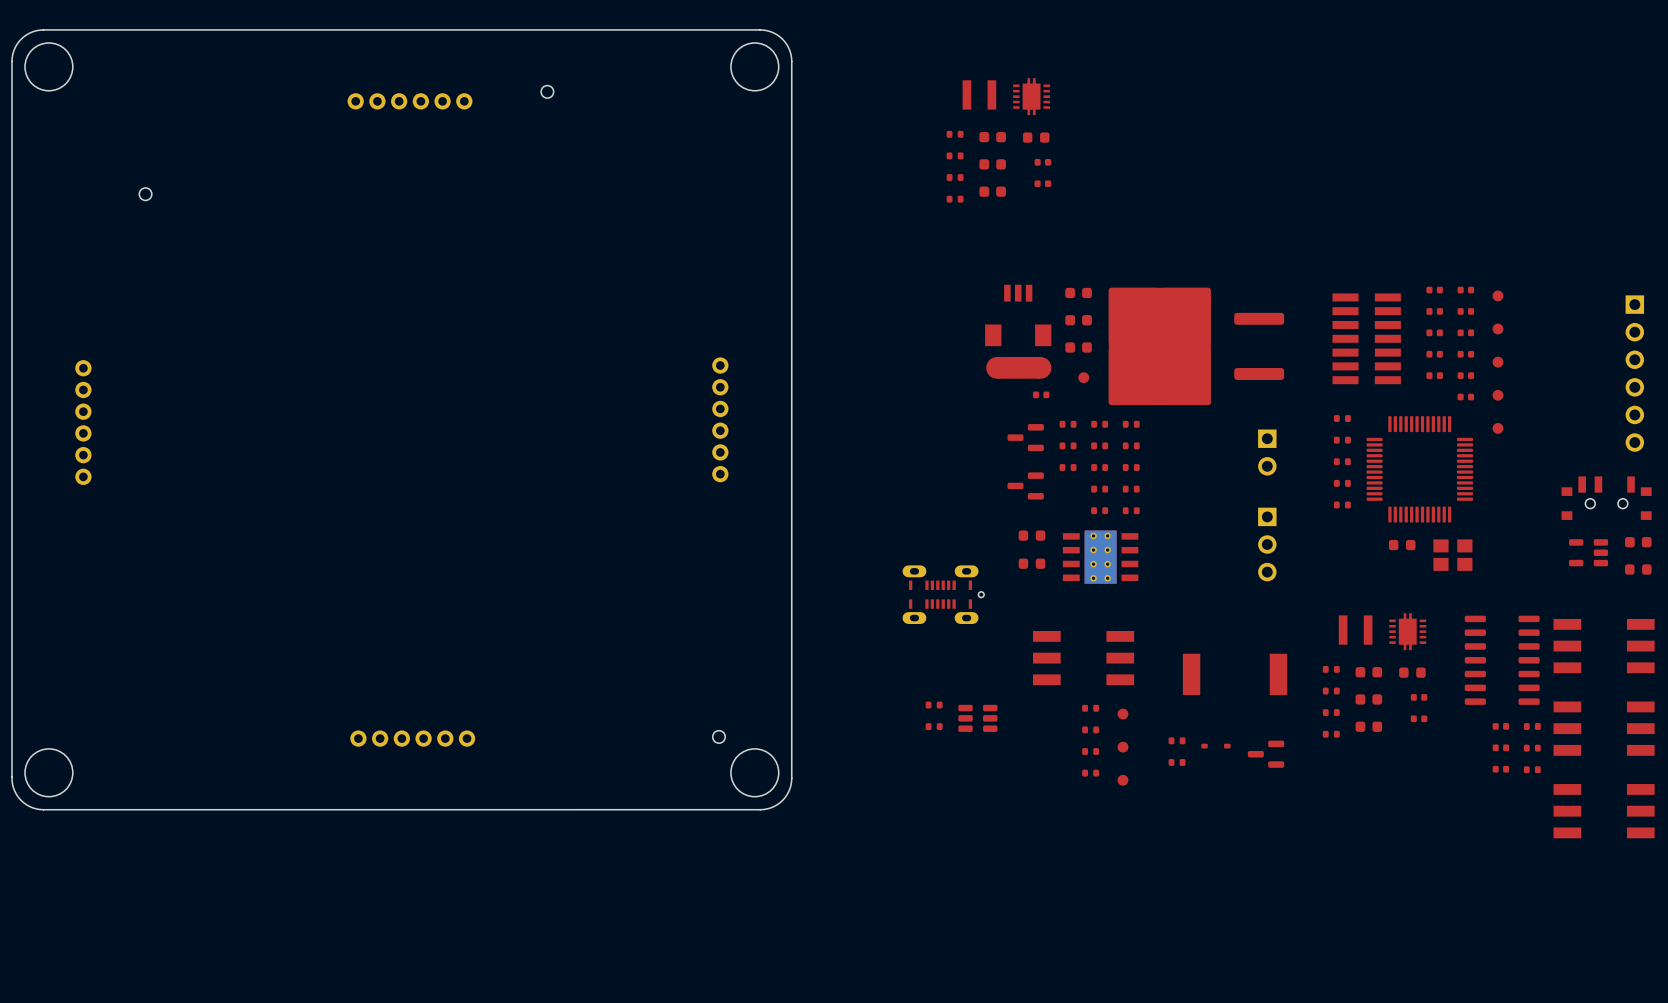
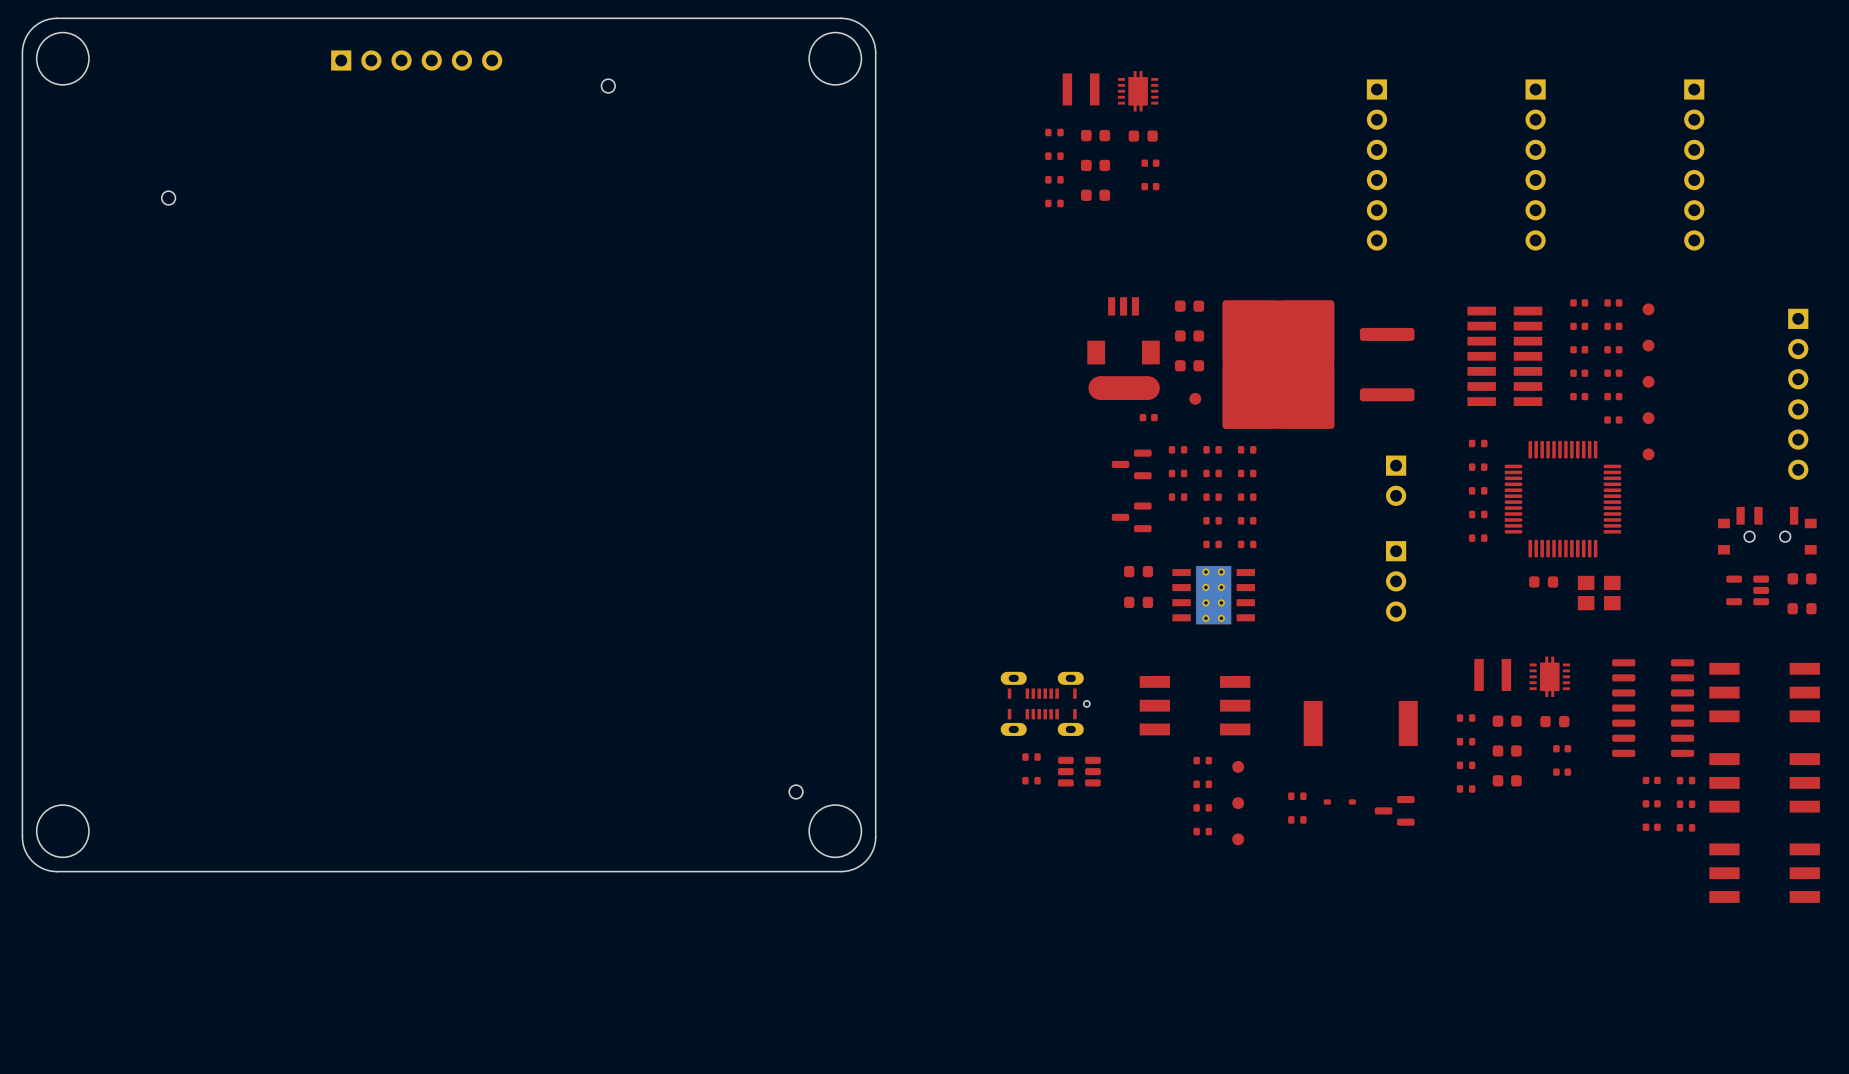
part: none -> (416, 60)
part: (410, 101) -> none
part: none -> (1376, 164)
part: none -> (1535, 164)
part: none -> (1694, 164)
part: (720, 419) -> none
part: (83, 422) -> none
part position: (939, 594) -> (1041, 703)
part: (412, 738) -> none

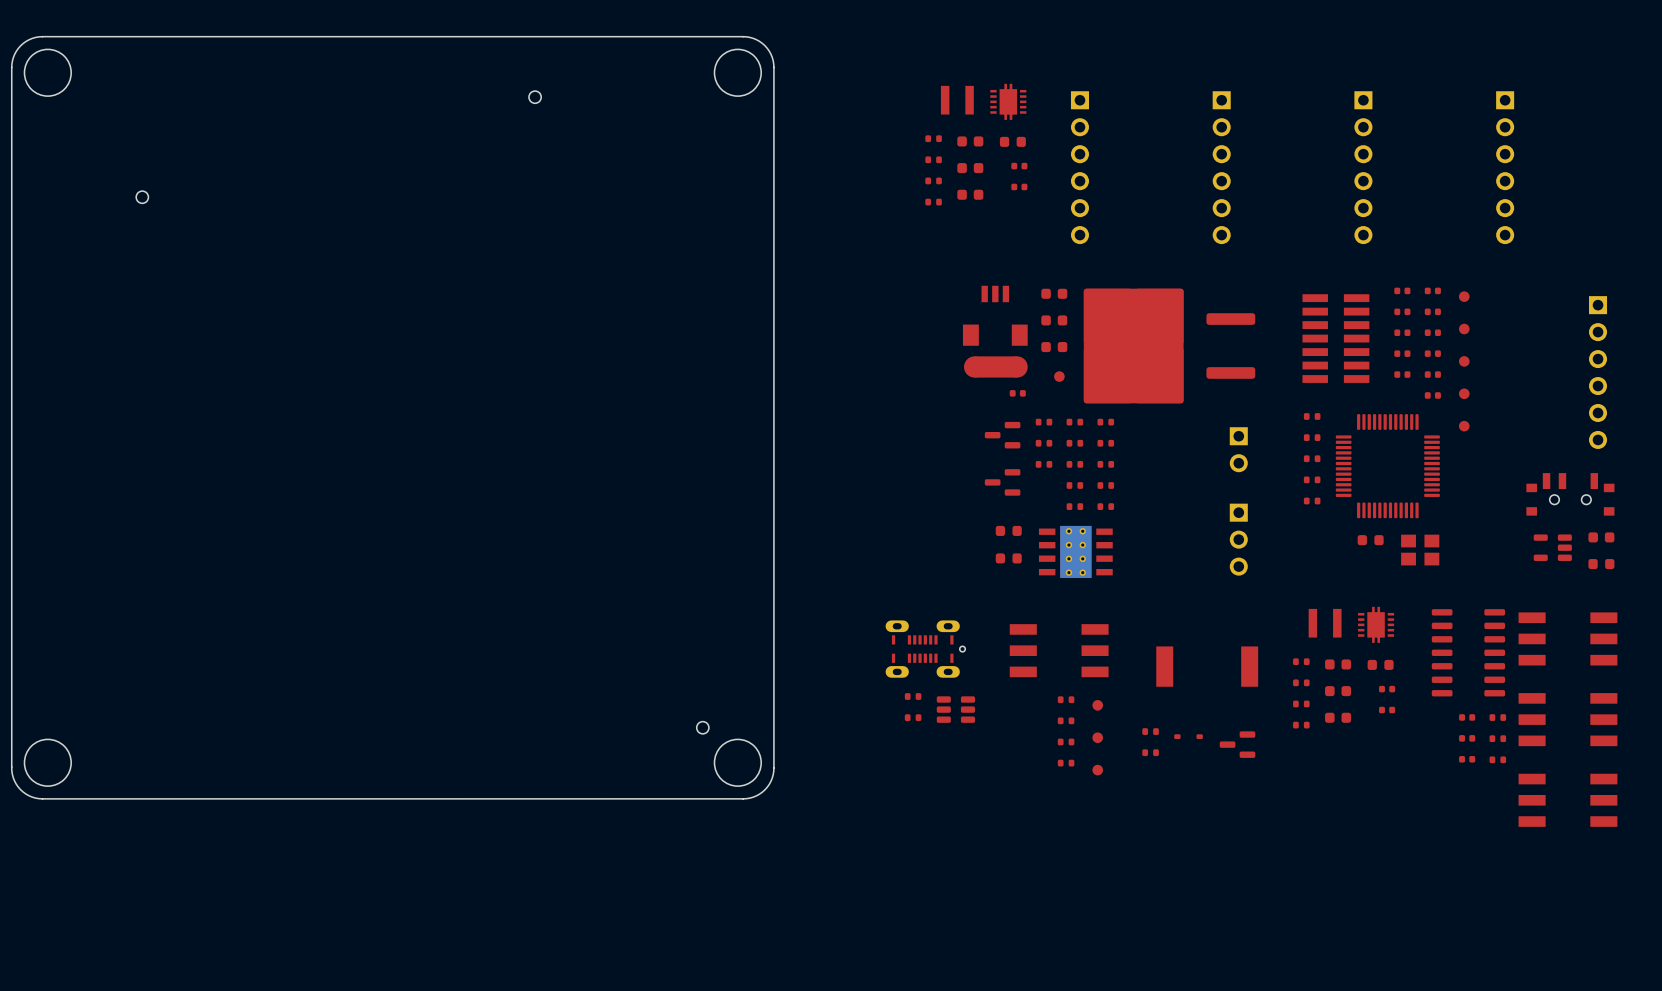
part: (416, 60) -> none
part: none -> (1079, 167)

